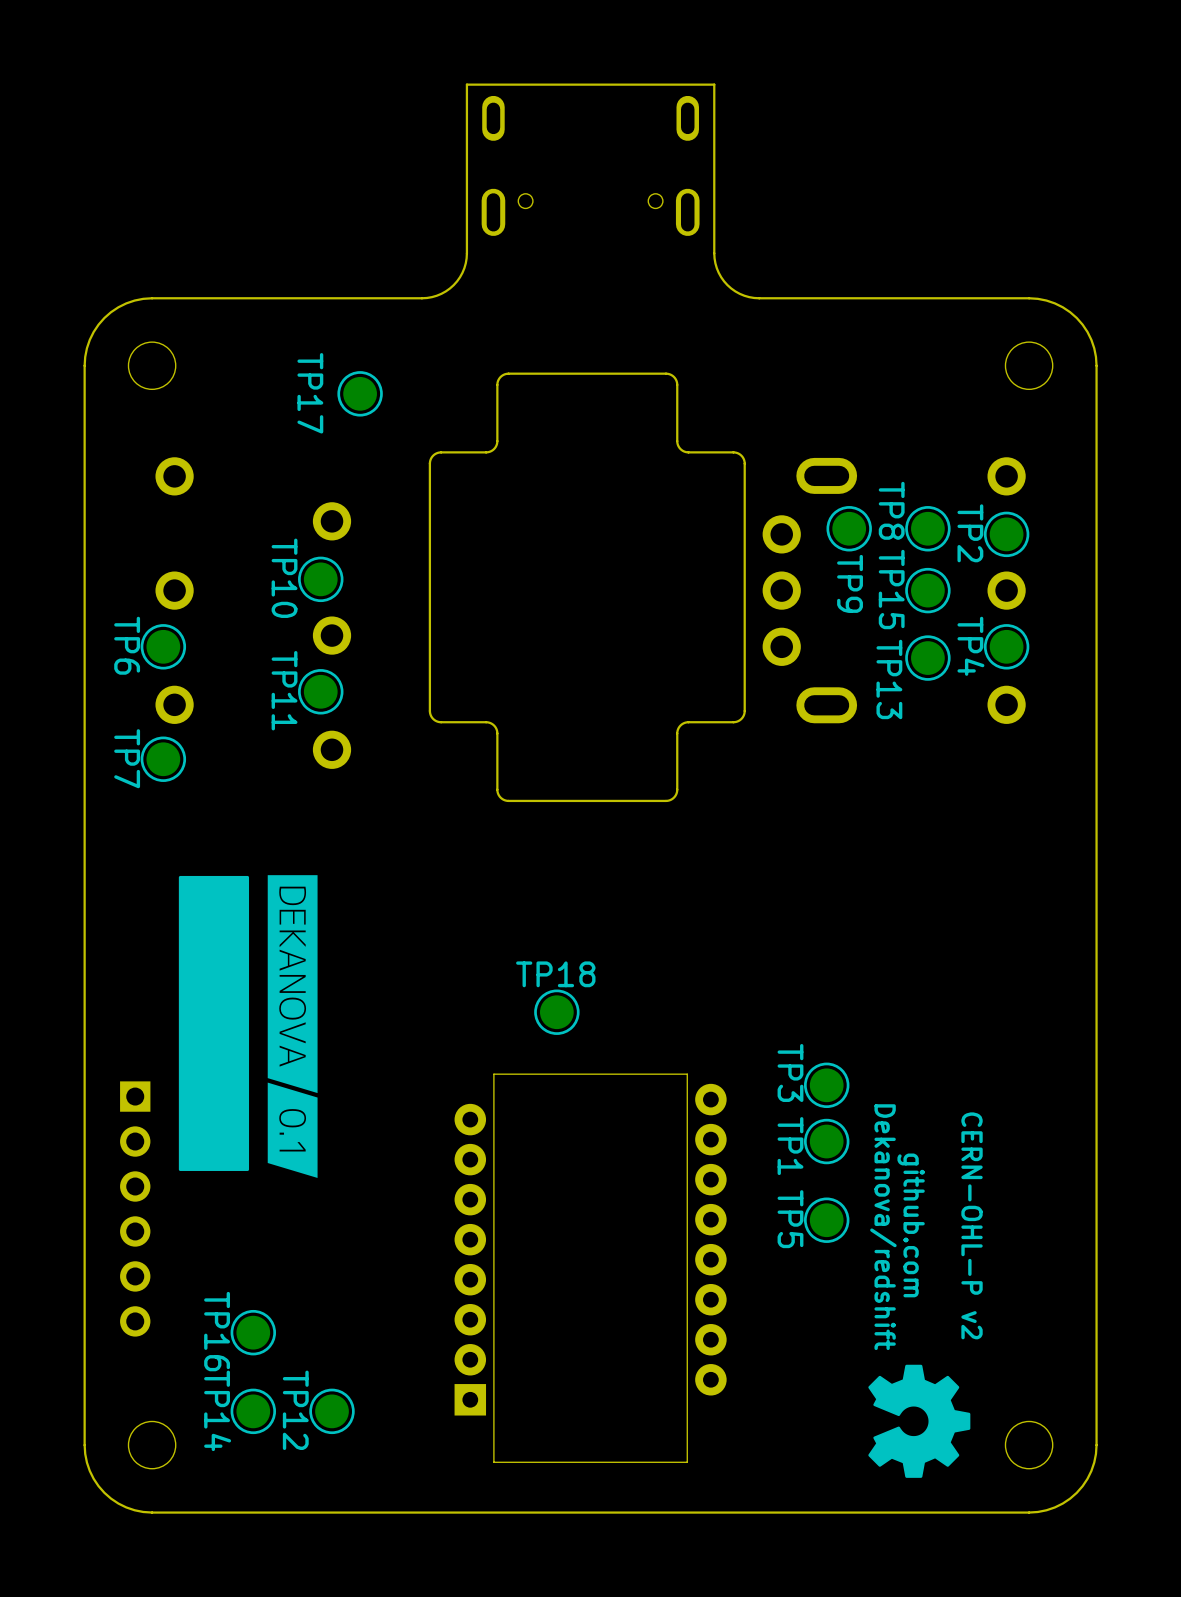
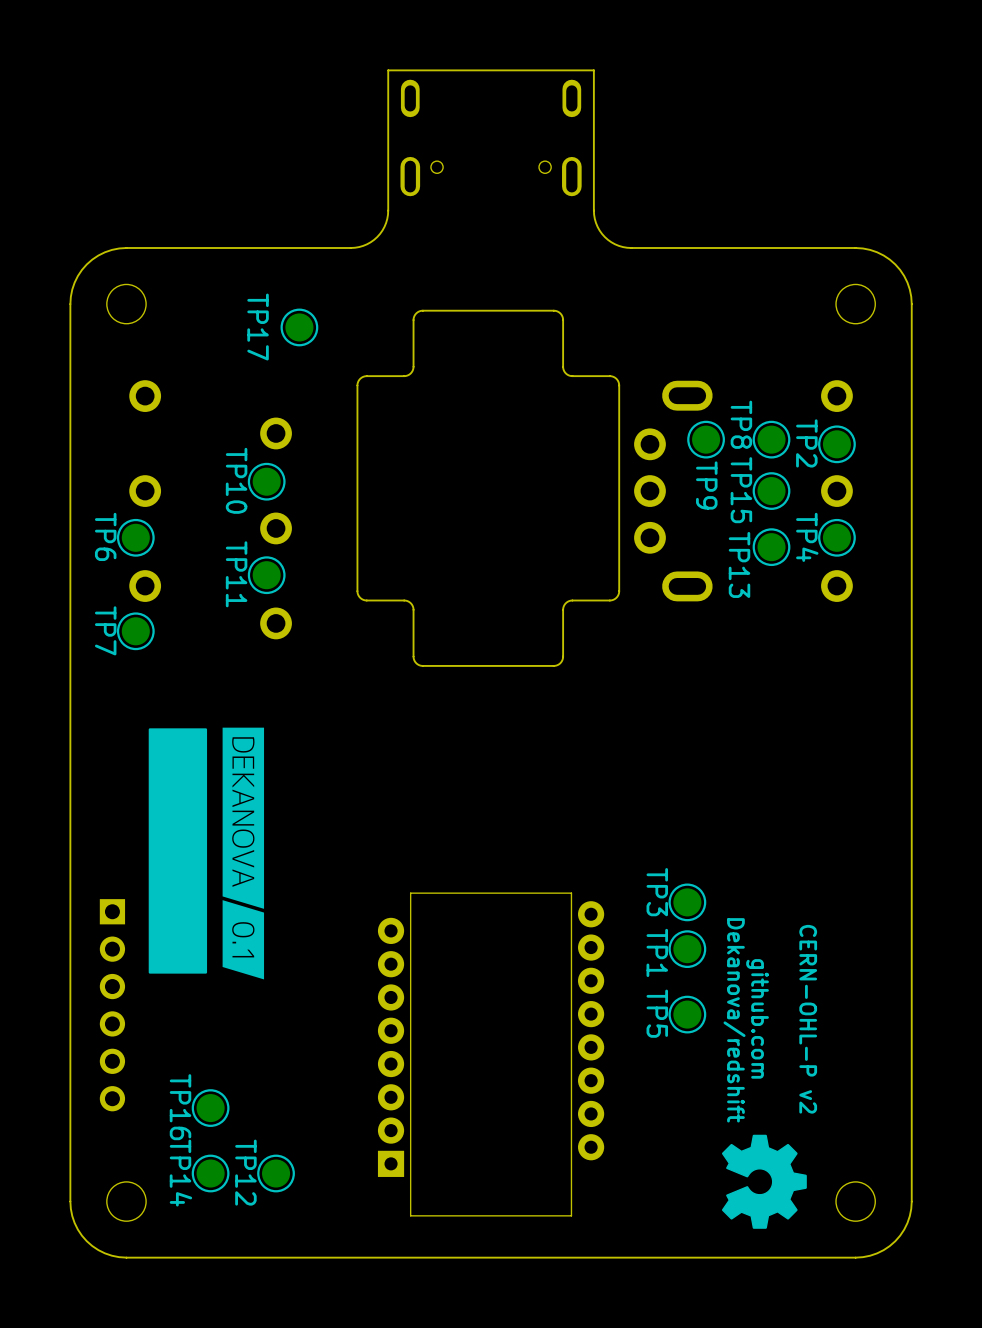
TP18: (556, 1012) -> none

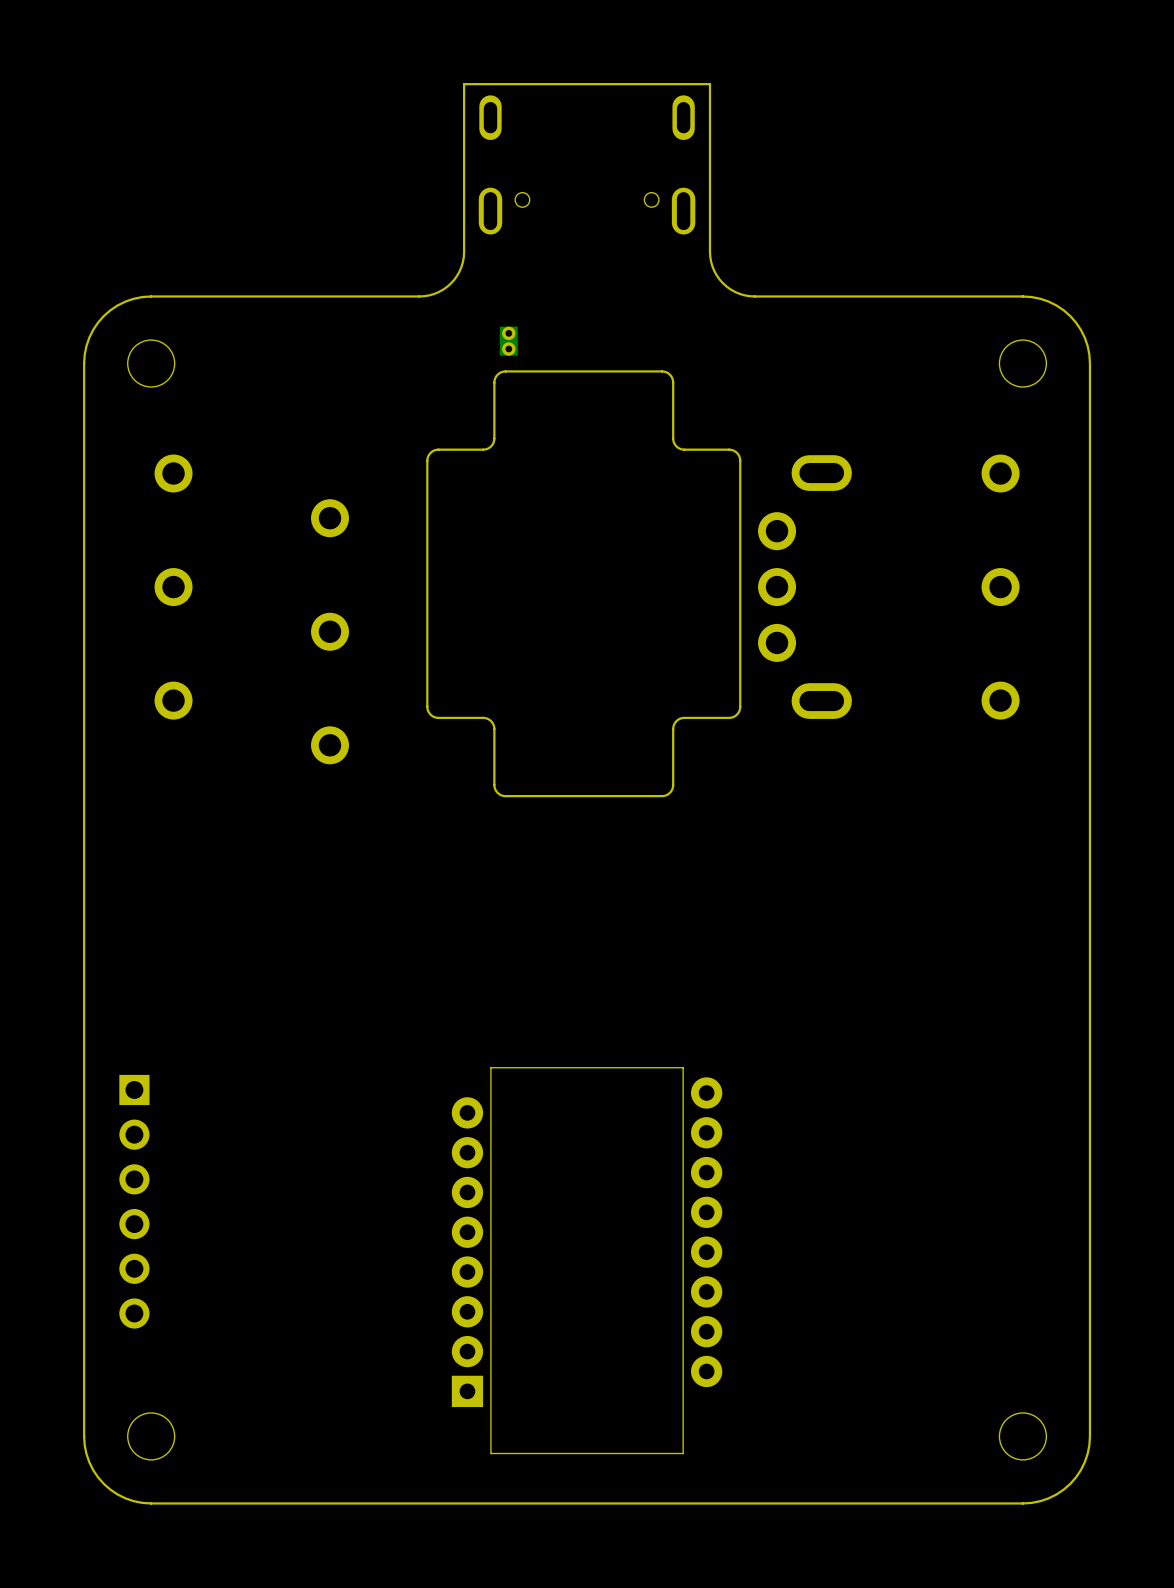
part: none -> (508, 341)
TP17: (299, 327) -> none
TP9: (706, 439) -> none
TP8: (771, 439) -> none
TP2: (836, 444) -> none
TP10: (266, 481) -> none
TP15: (771, 491) -> none
TP6: (135, 537) -> none
TP4: (836, 537) -> none
TP13: (771, 547) -> none
TP11: (266, 575) -> none
TP7: (135, 631) -> none
drawing: [148, 727, 265, 980] -> none
TP3: (687, 902) -> none
TP1: (687, 949) -> none
TP5: (687, 1014) -> none
text: github.com (757, 1018) -> none
text: CERN-OHL-P v2 (808, 1019) -> none
text: Dekanova/redshift (734, 1020) -> none
TP16: (210, 1108) -> none
drawing: [722, 1134, 807, 1229] -> none
TP14: (210, 1173) -> none
TP12: (276, 1173) -> none

